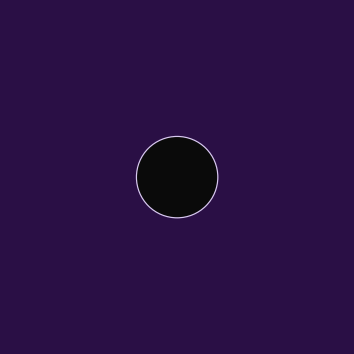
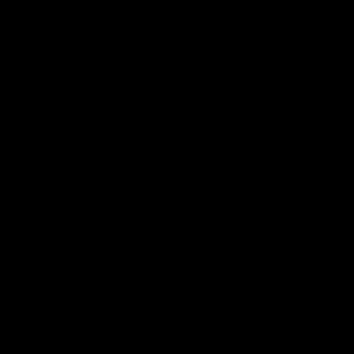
part: (177, 177) -> none

